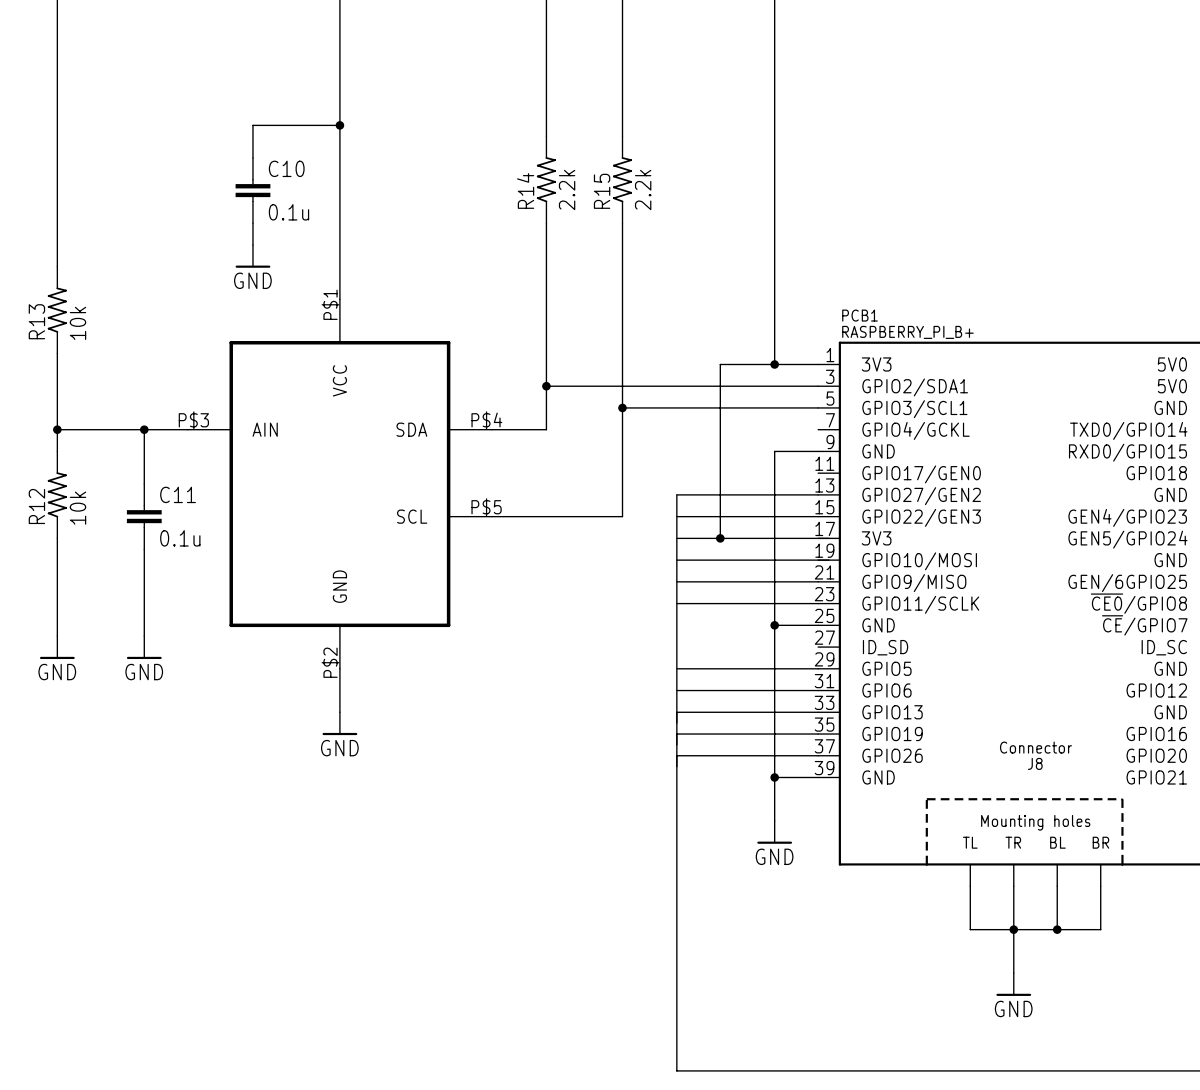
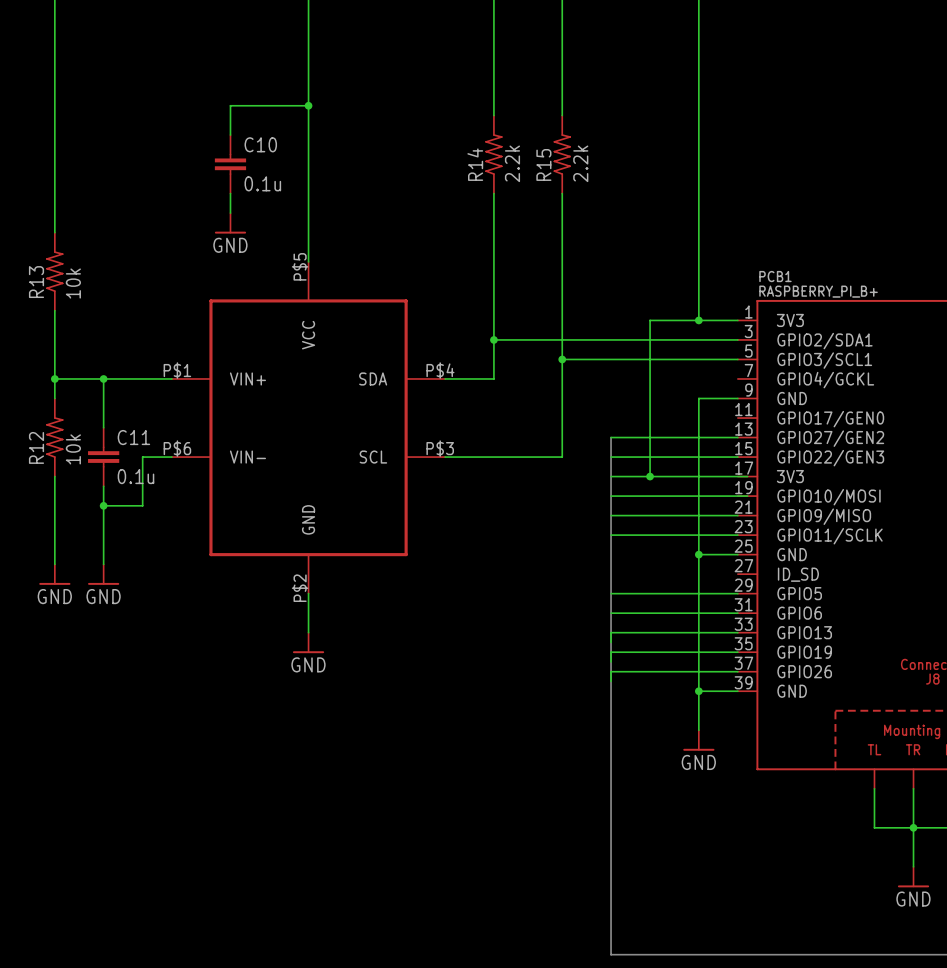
part symbol: [187, 299, 493, 669] -> [171, 261, 446, 594]
wire: (144, 429) (144, 484) -> (103, 378) (103, 427)
junction position: (144, 429) -> (103, 378)
C11 position: (144, 516) -> (103, 457)
wire: none -> (171, 457) (142, 457) (142, 505) (103, 505)
wire: (144, 549) (144, 636) -> (103, 486) (103, 564)
junction: none -> (103, 505)
power symbol position: GND (144, 647) -> GND (103, 574)

